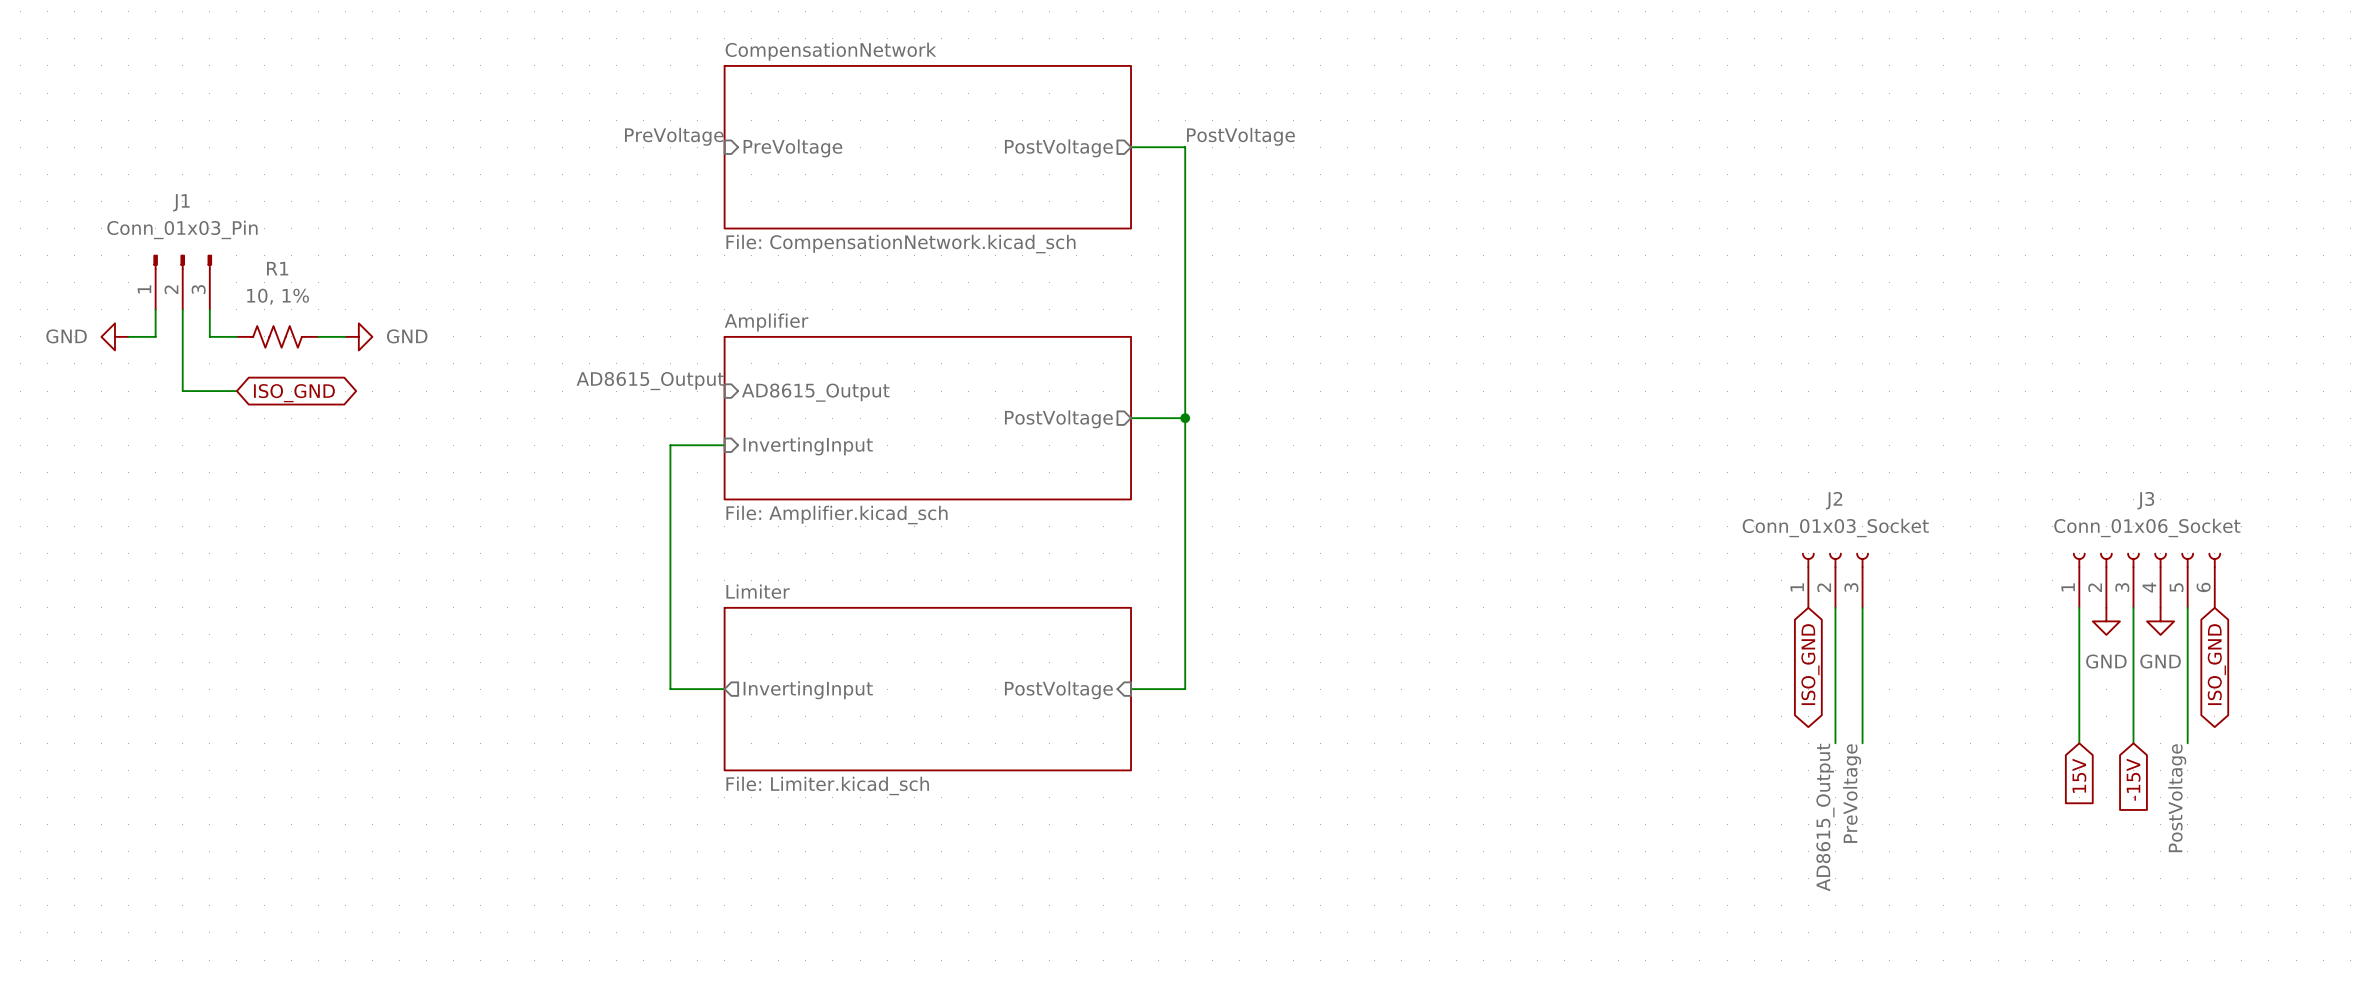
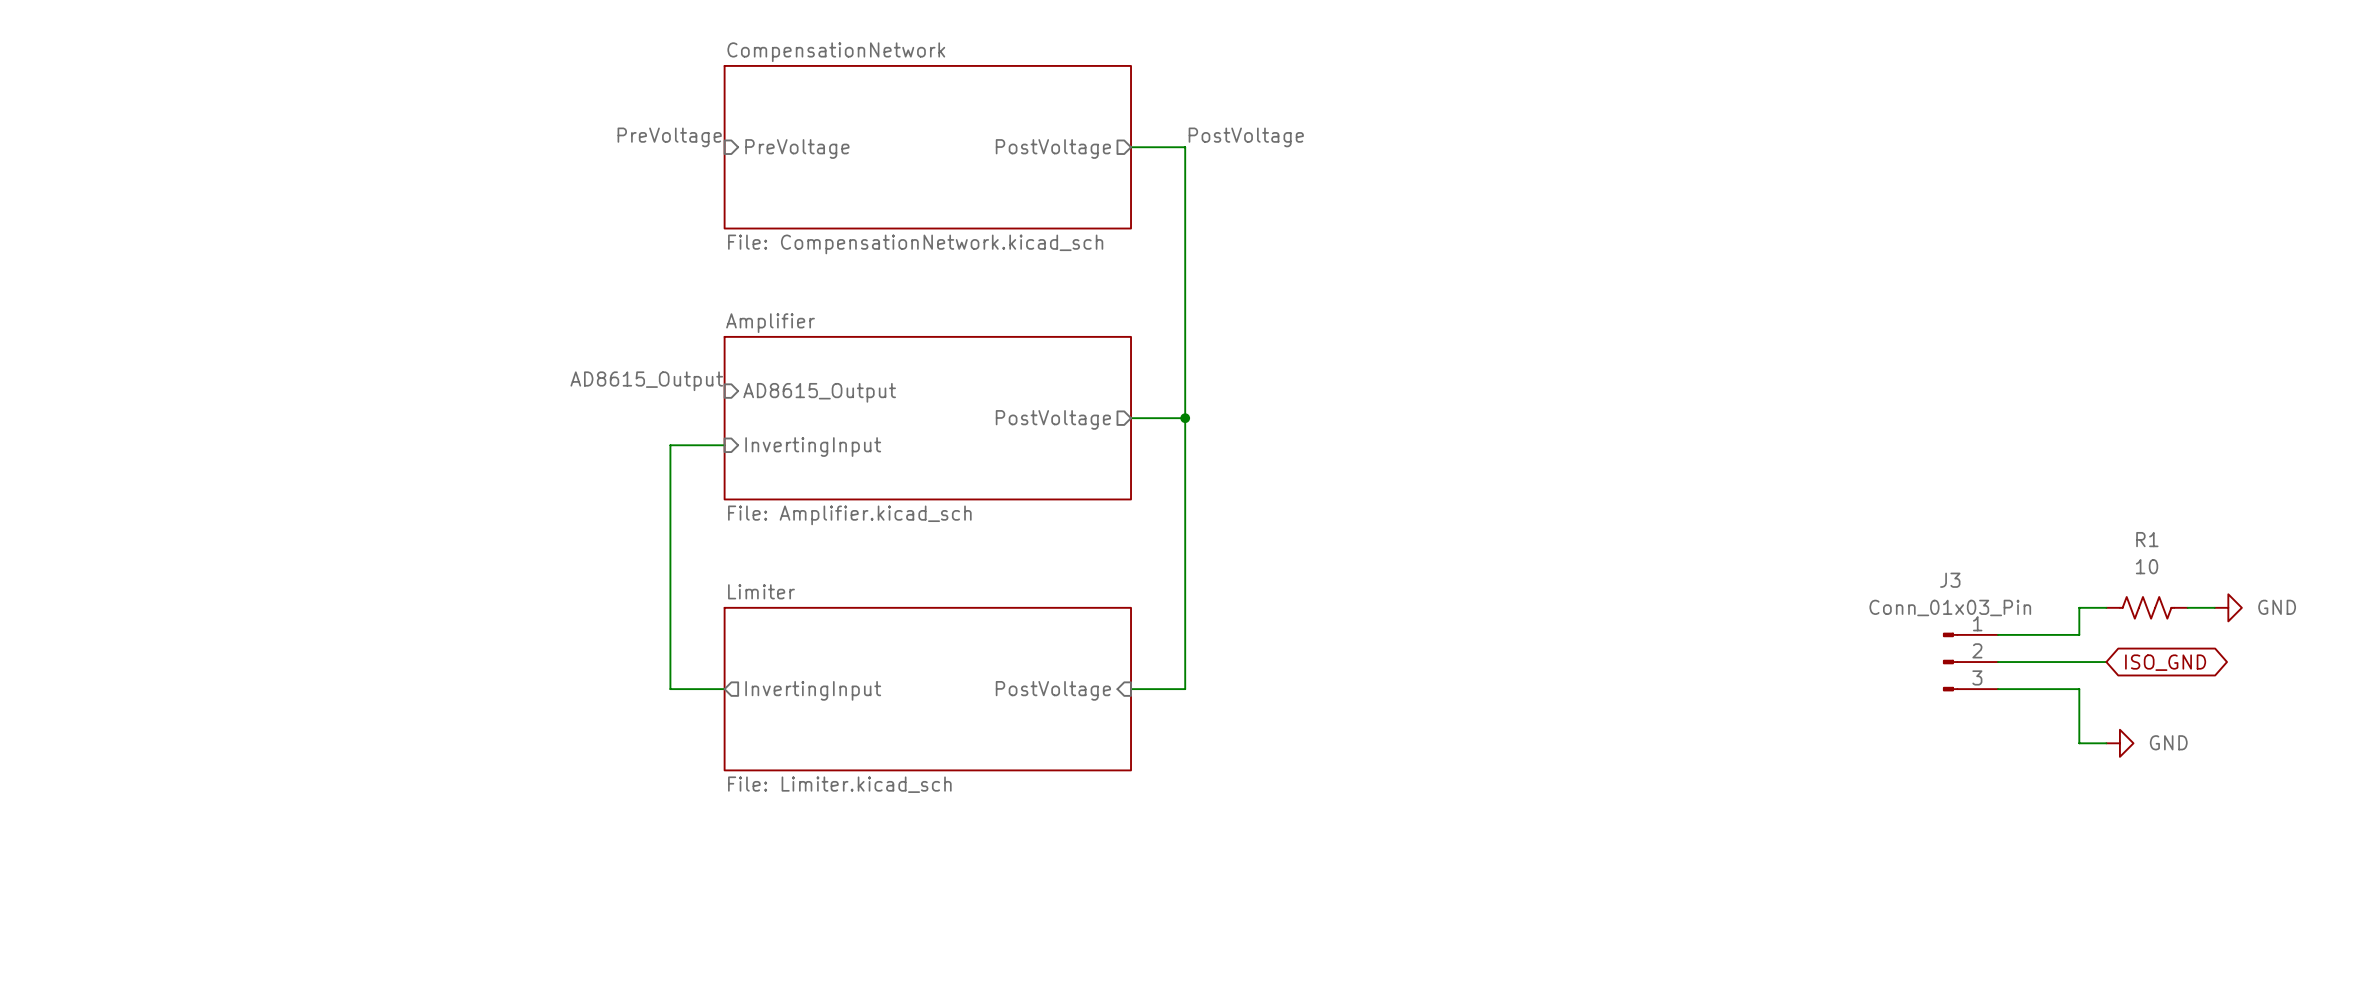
J1: Conn_01x03_Pin (182, 282) -> none
R1 value: 10, 1% (278, 296) -> 10 (2147, 566)
wire: (155, 309) (155, 336) (128, 336) -> none
wire: (182, 309) (182, 391) (236, 391) -> none
wire: (209, 309) (209, 336) (236, 336) -> none
power symbol: GND (114, 336) -> none
R1 position: (277, 336) -> (2147, 607)
wire: (318, 336) (345, 336) -> none
power symbol: GND (358, 336) -> none
global label: ISO_GND (294, 393) -> none
J3 value: Conn_01x06_Socket (2147, 527) -> Conn_01x03_Pin (1950, 607)
J3 symbol: [2073, 552, 2222, 608] -> [1943, 632, 1999, 692]
J2: Conn_01x03_Socket (1835, 580) -> none
wire: (1835, 607) (1835, 743) -> none
wire: (1862, 607) (1862, 743) -> none
wire: none -> (2079, 607) (2106, 607)
wire: (2133, 607) (2133, 743) -> none
wire: (2187, 607) (2187, 743) -> (2187, 607) (2214, 607)
power symbol: none -> GND (2228, 607)
power symbol: GND (2106, 621) -> none
power symbol: GND (2160, 621) -> none
wire: (2079, 634) (2079, 689) -> (2079, 634) (1998, 634)
wire: none -> (1998, 662) (2106, 662)
global label: ISO_GND (1810, 664) -> none
global label rotation: 0° (2216, 664) -> 90° counterclockwise (2165, 662)
wire: none -> (1998, 689) (2079, 689)
wire: none -> (2079, 743) (2106, 743)
power symbol: none -> GND (2119, 743)
global label: 15V (2079, 775) -> none
global label: -15V (2133, 779) -> none
label: PreVoltage (1852, 793) -> none
label: PostVoltage (2177, 798) -> none
label: AD8615_Output (1825, 817) -> none

